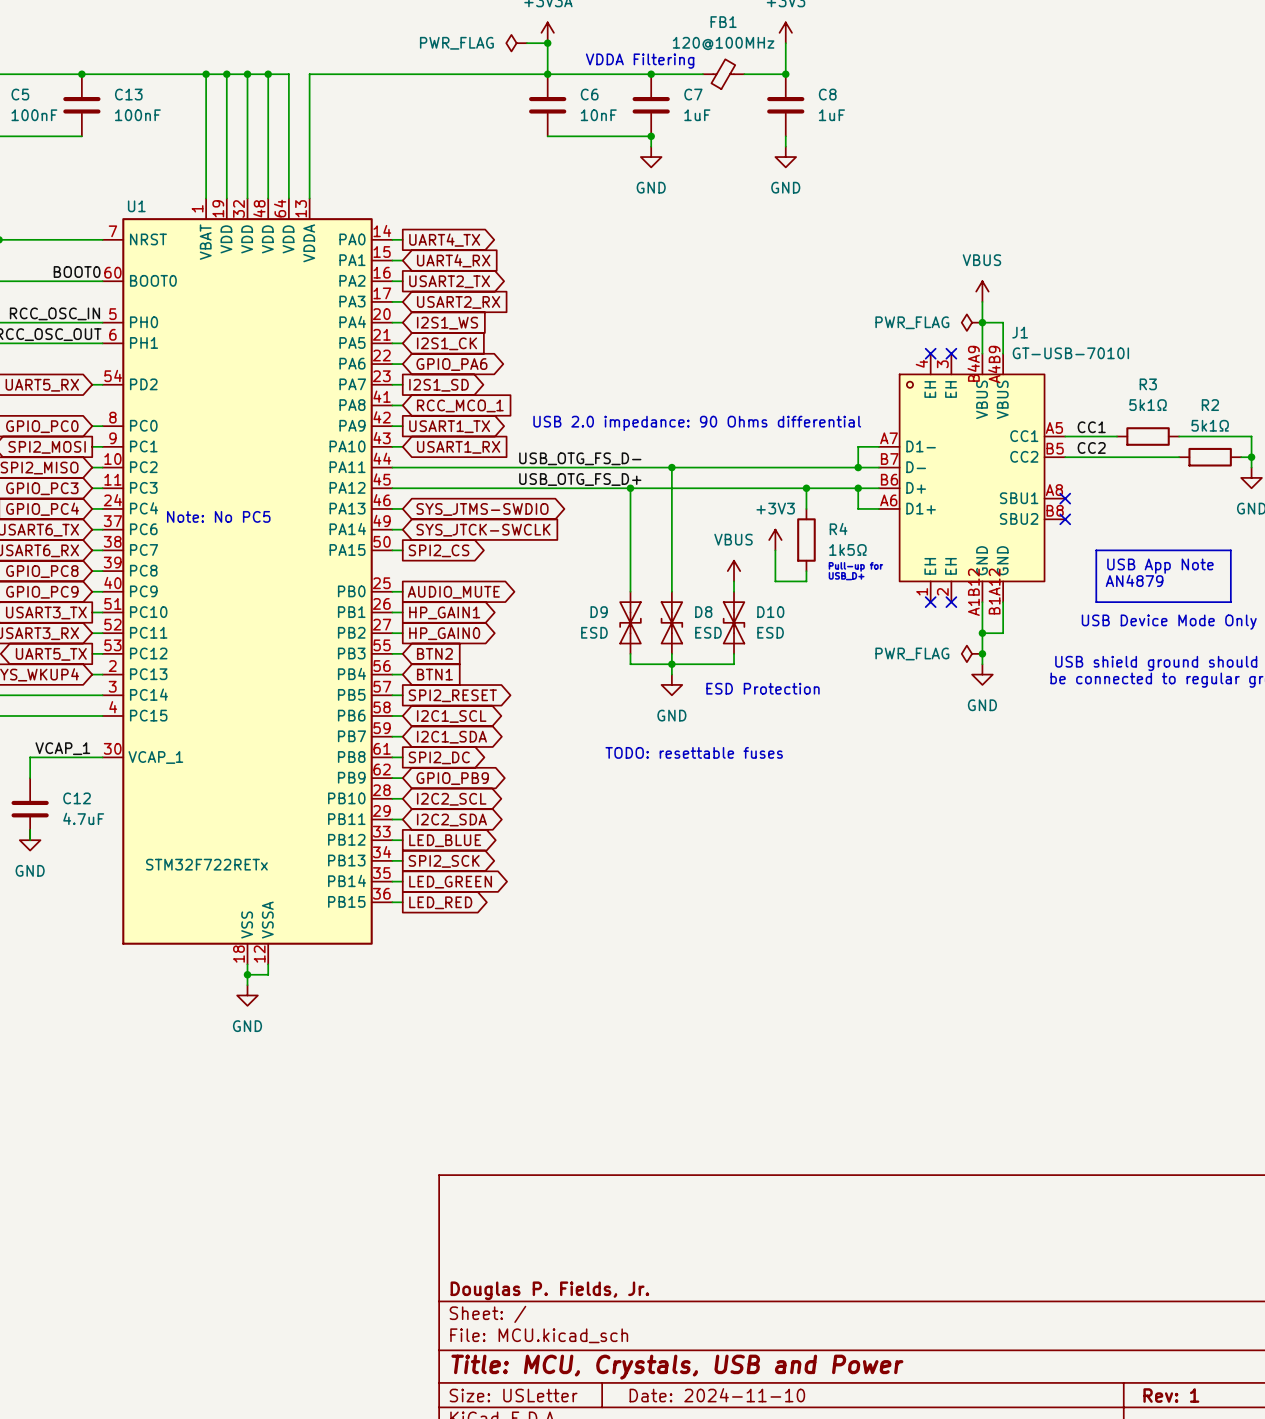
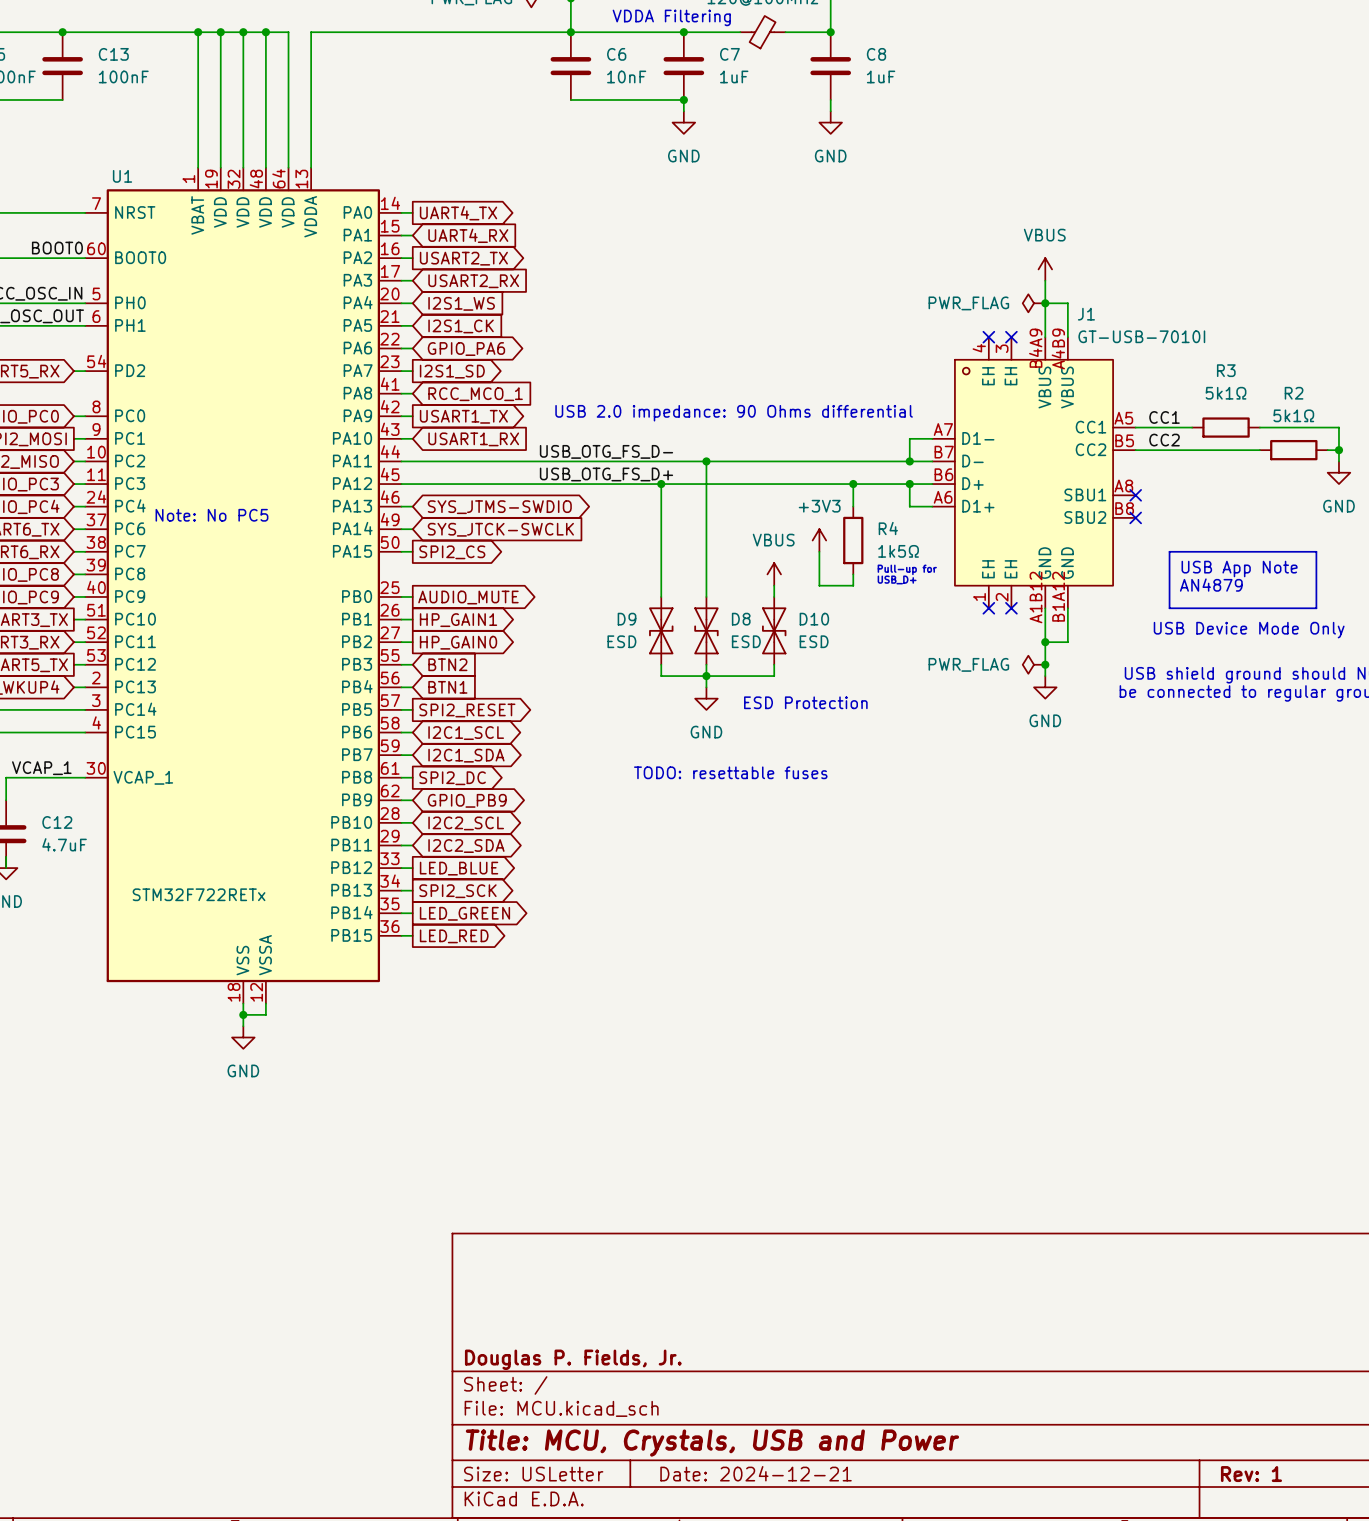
title block: Date: 2024-11-10 (717, 1395) -> Date: 2024-12-21 (756, 1473)

